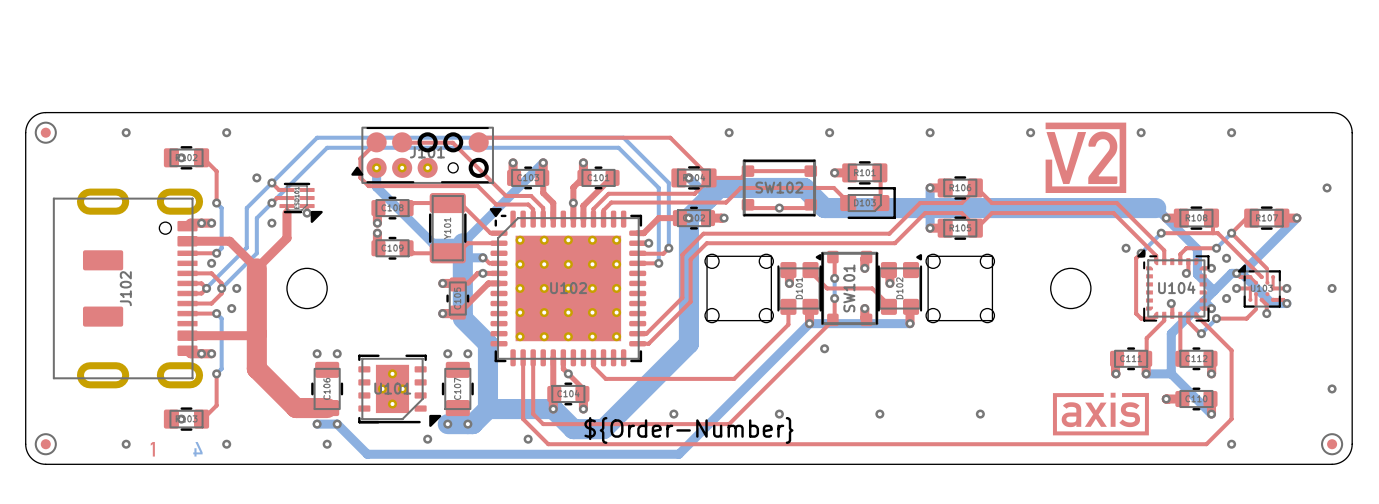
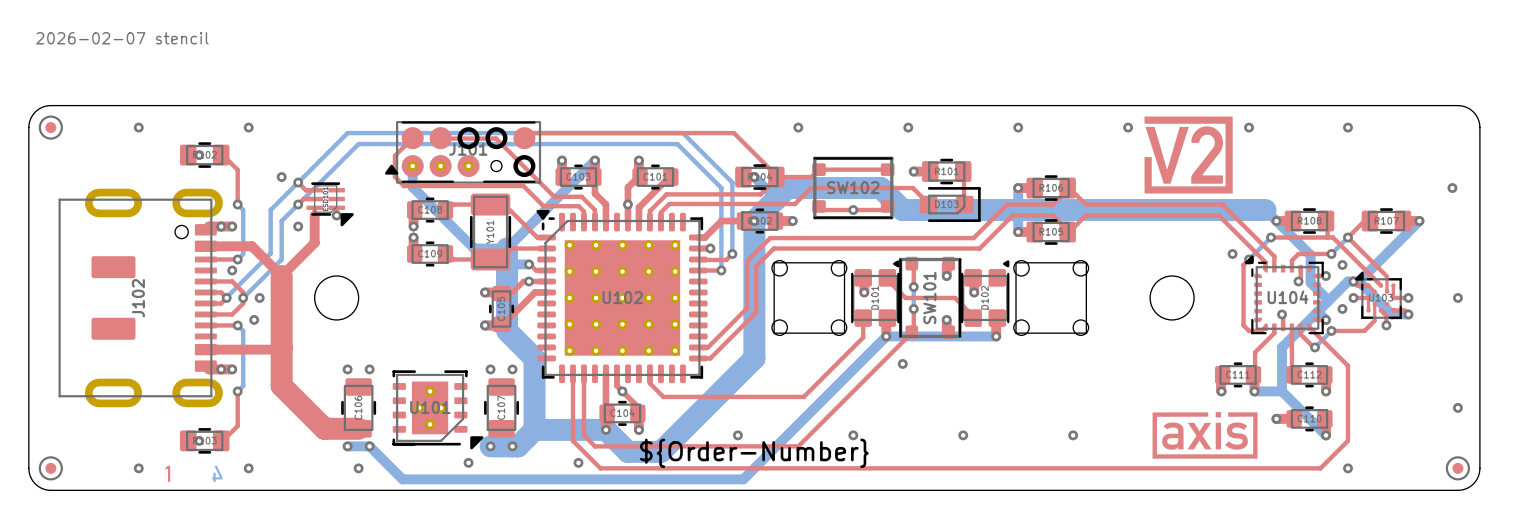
text: none -> 2026-02-07 stencil (122, 38)

